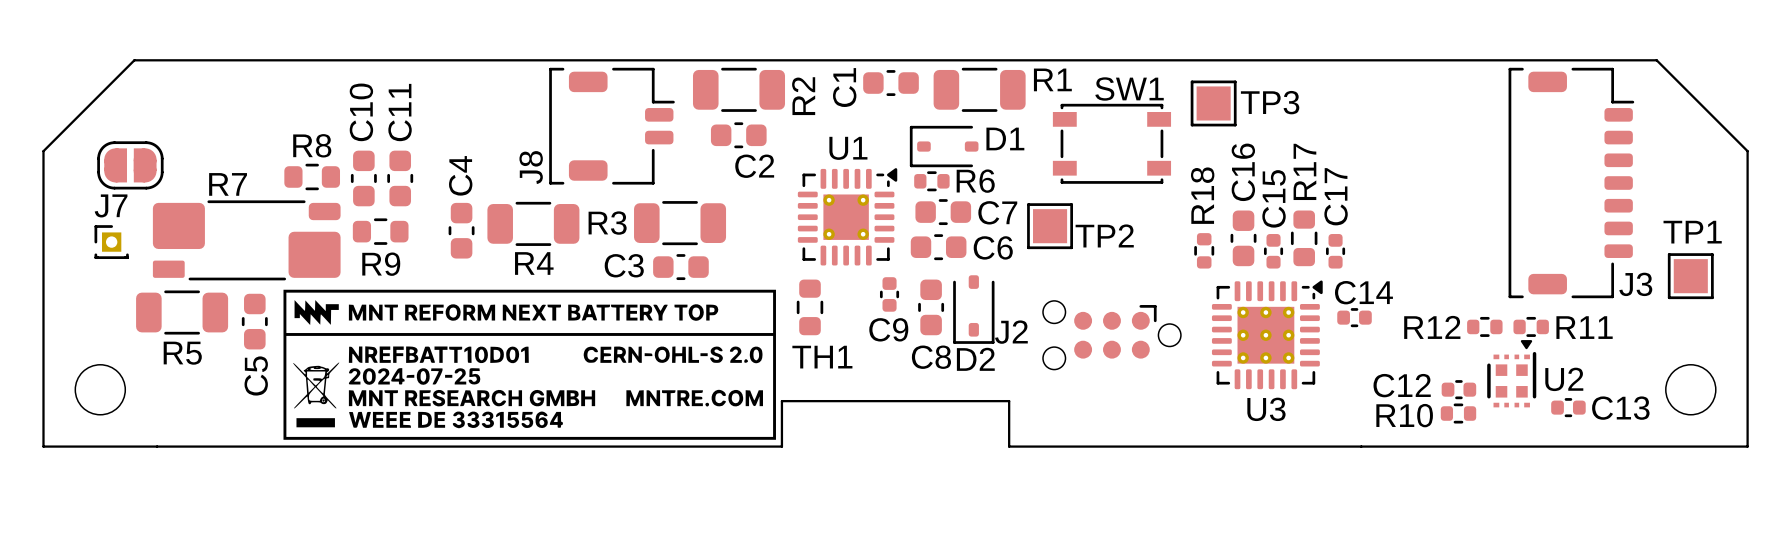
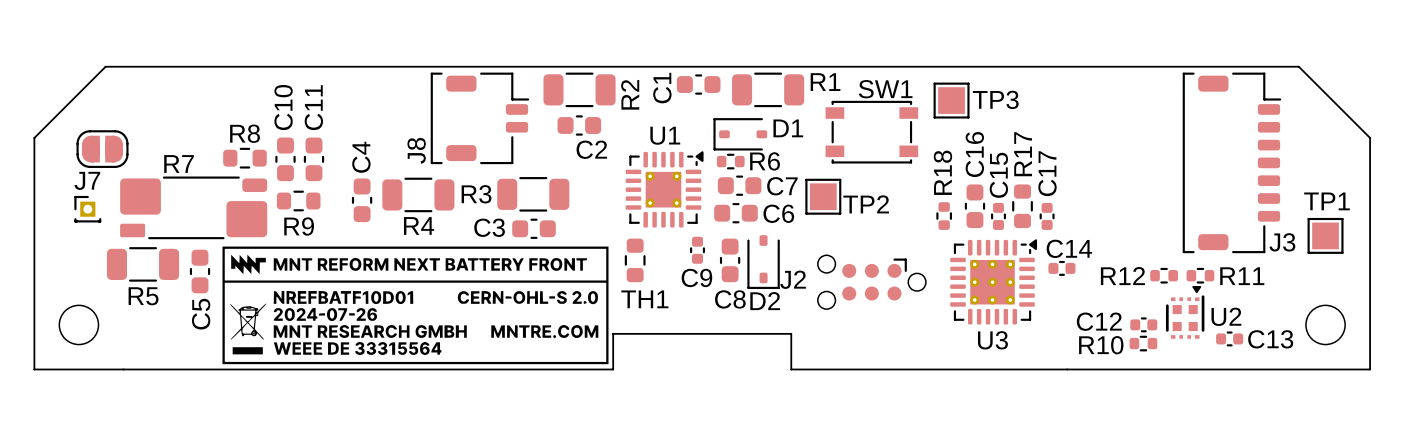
drawing shape: [283, 289, 776, 440] -> [222, 246, 609, 365]

